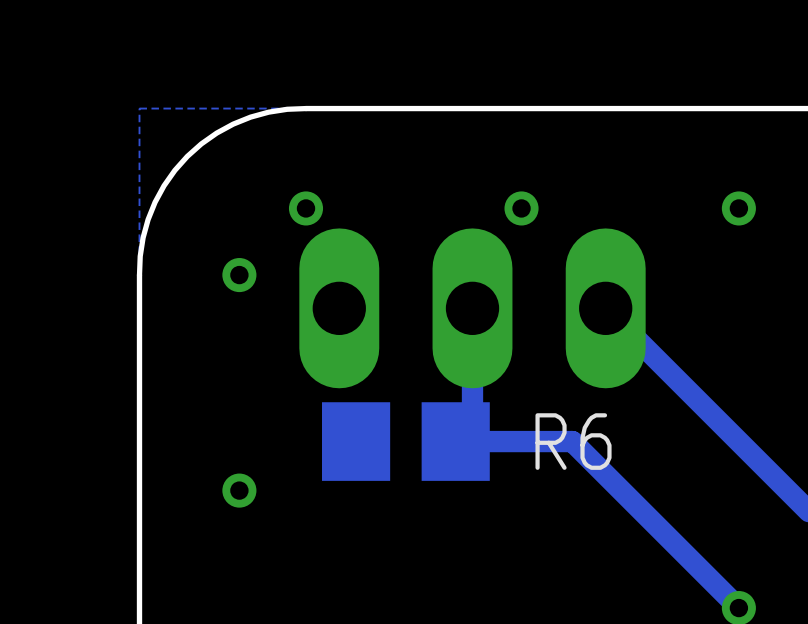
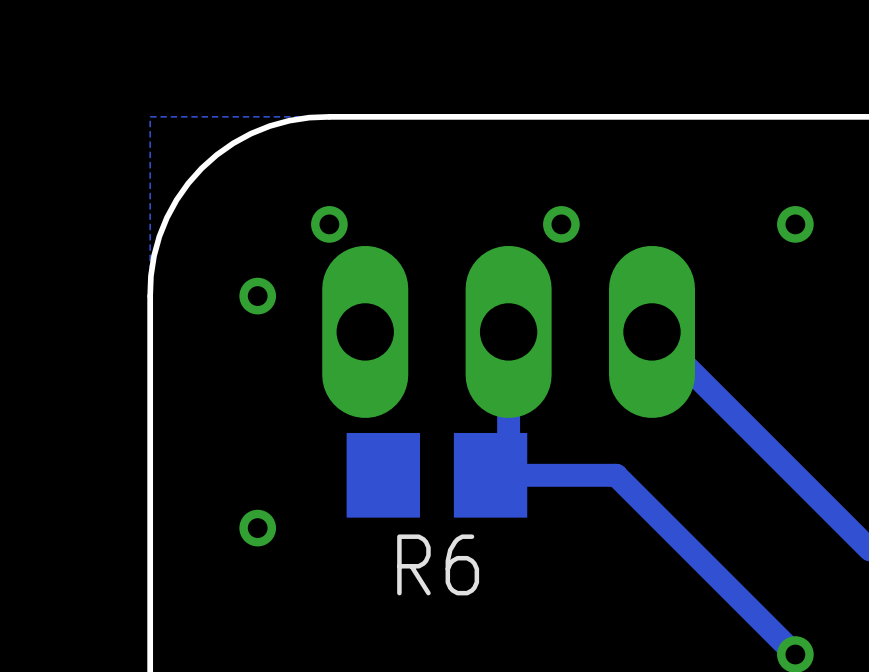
R6 name position: R6 (573, 441) -> R6 (438, 564)

